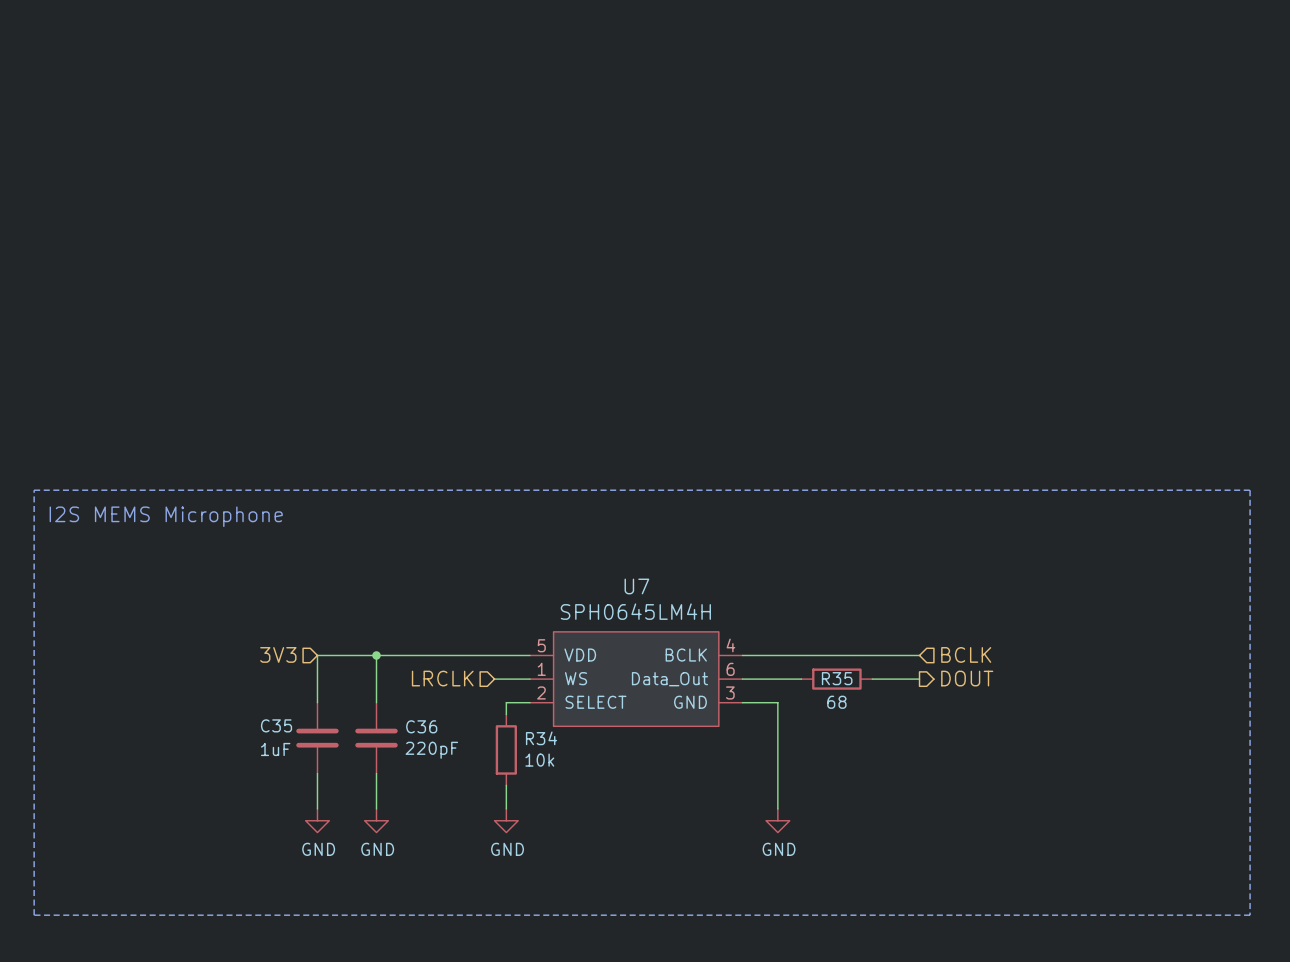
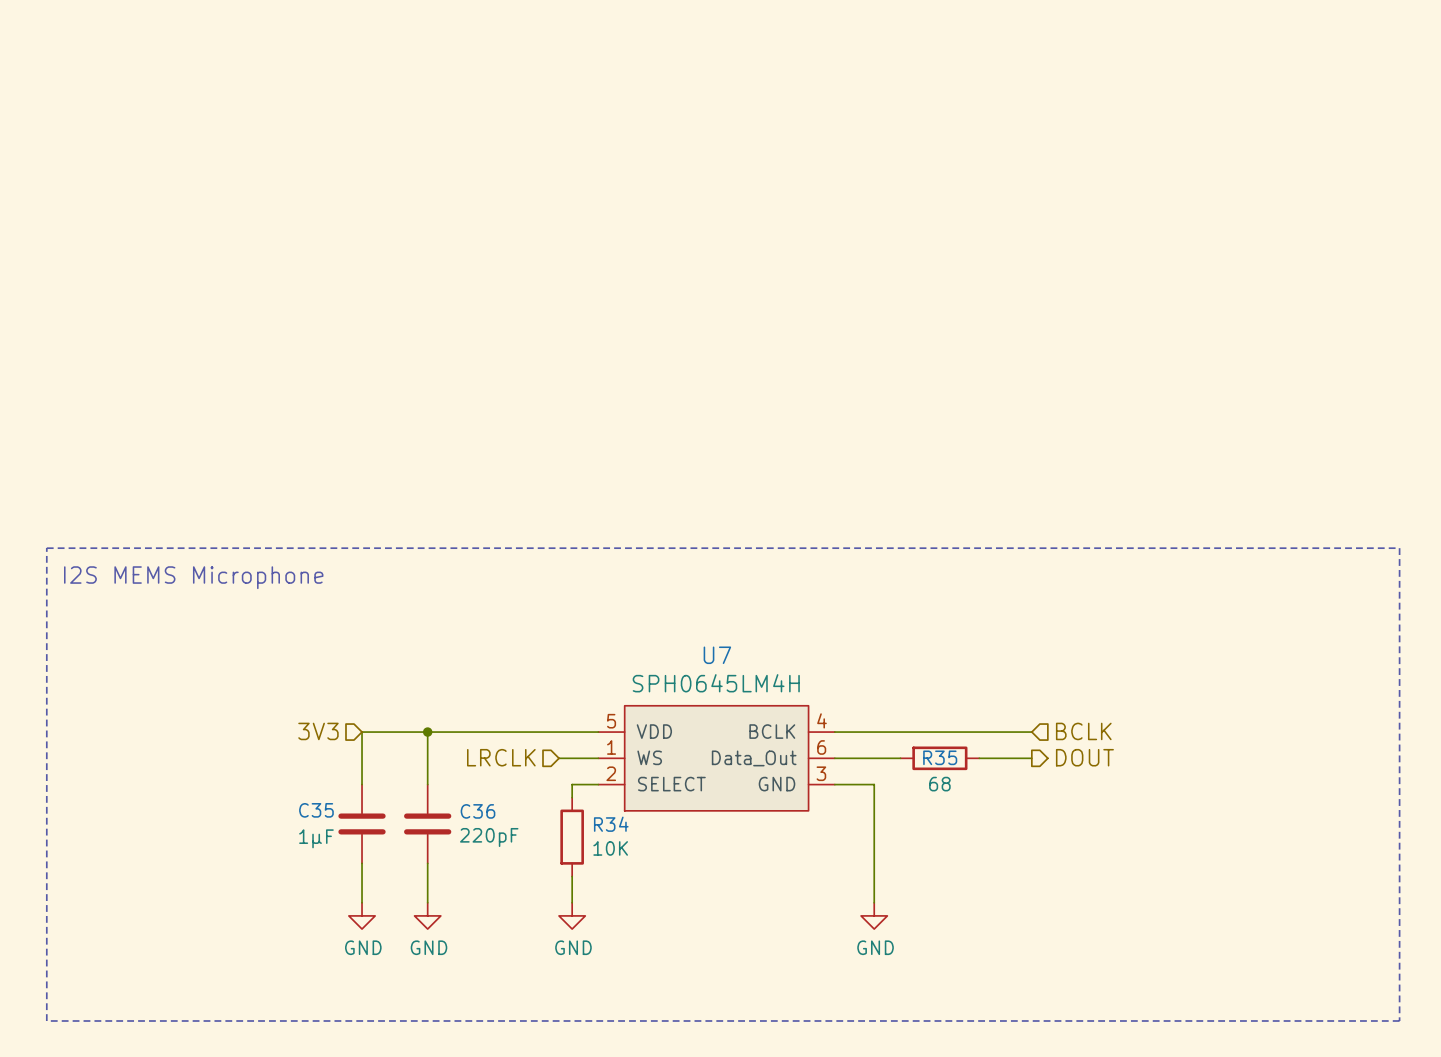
C35 value: 1uF (275, 749) -> 1µF (316, 838)
R34 value: 10k (539, 760) -> 10K (610, 848)

